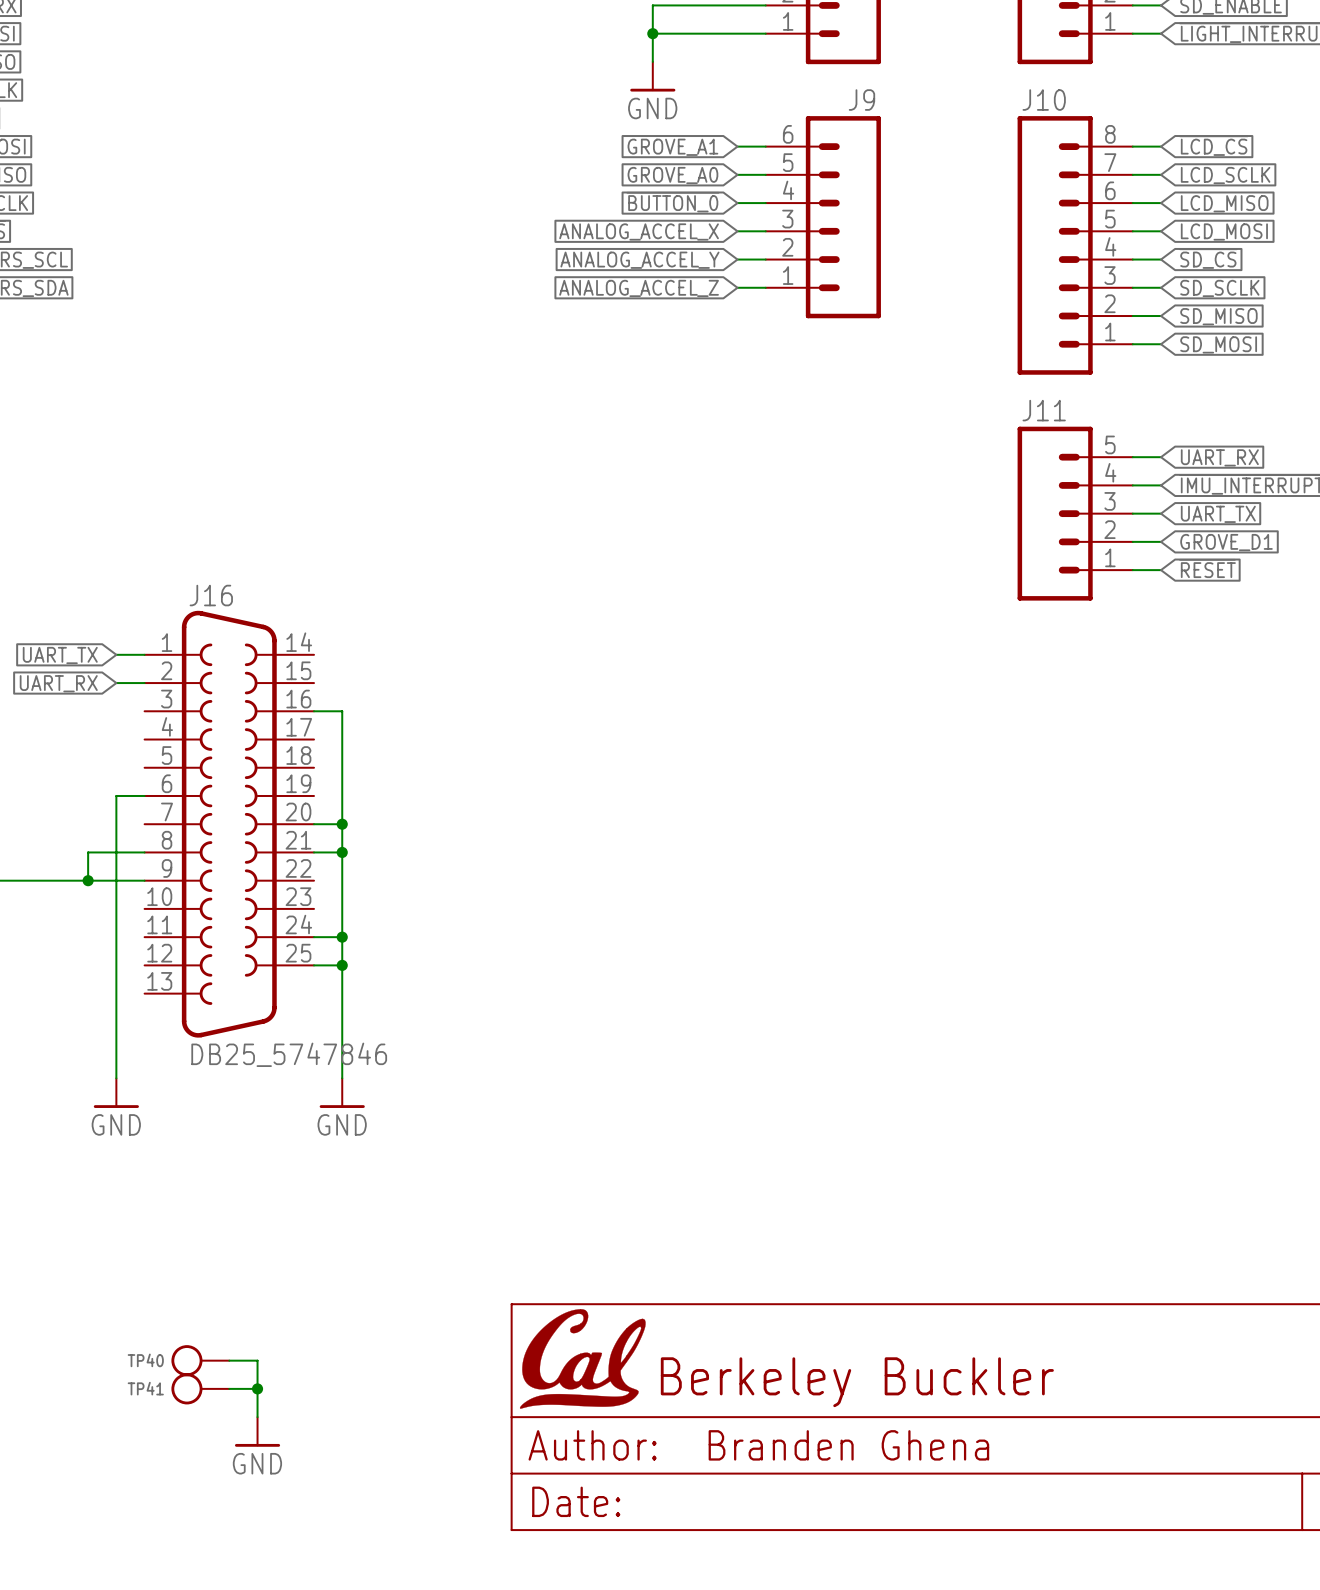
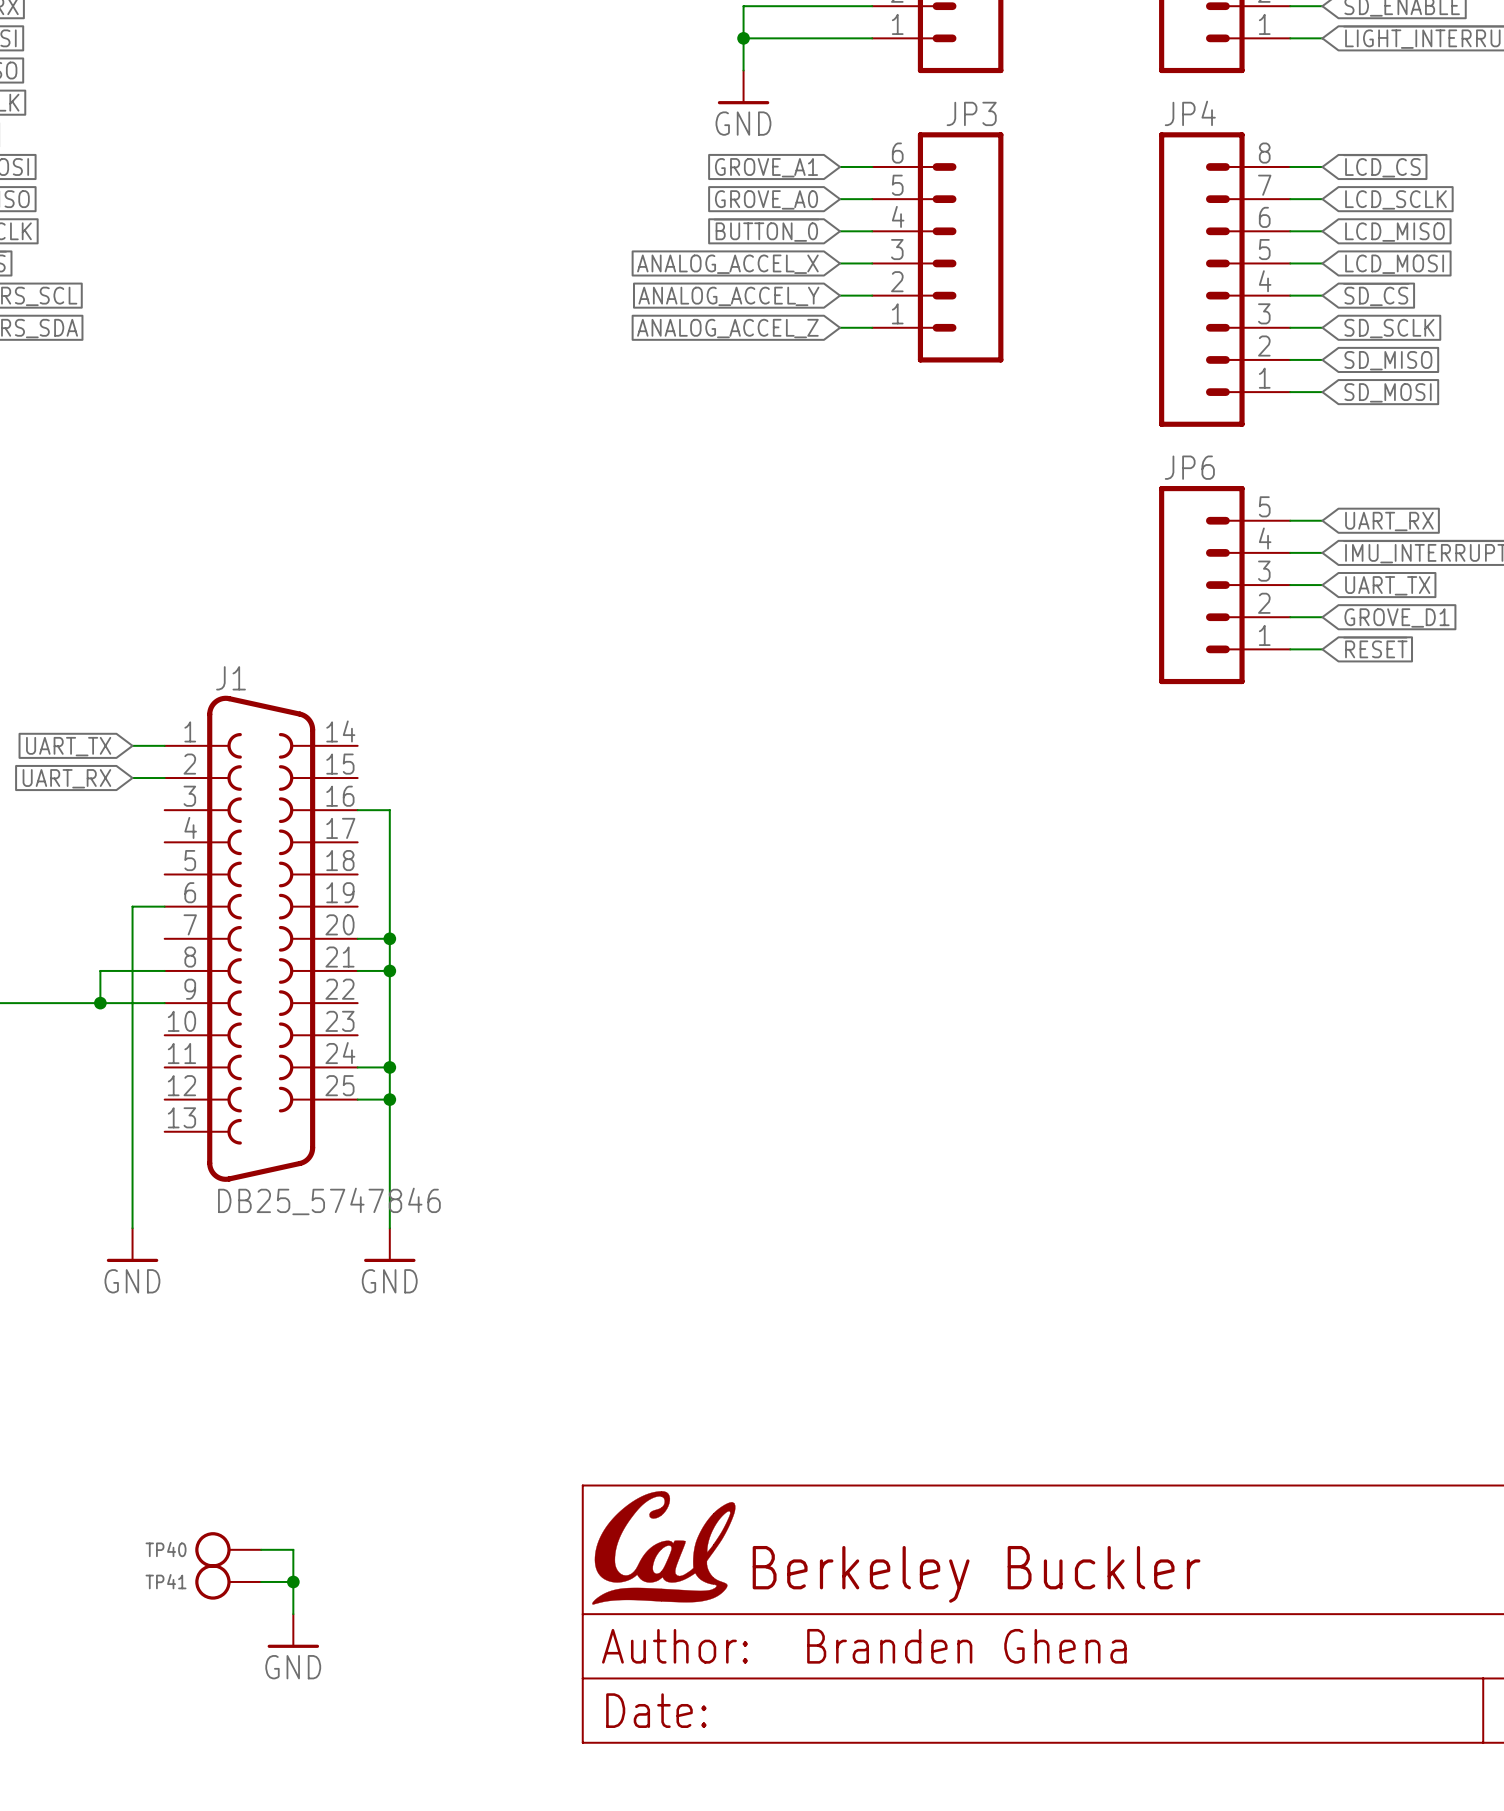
J9 name: J9 (861, 100) -> JP3 (971, 113)
J10 name: J10 (1044, 100) -> JP4 (1190, 113)
J11 name: J11 (1044, 410) -> JP6 (1189, 467)
J16 name: J16 (211, 595) -> J1 (231, 678)

